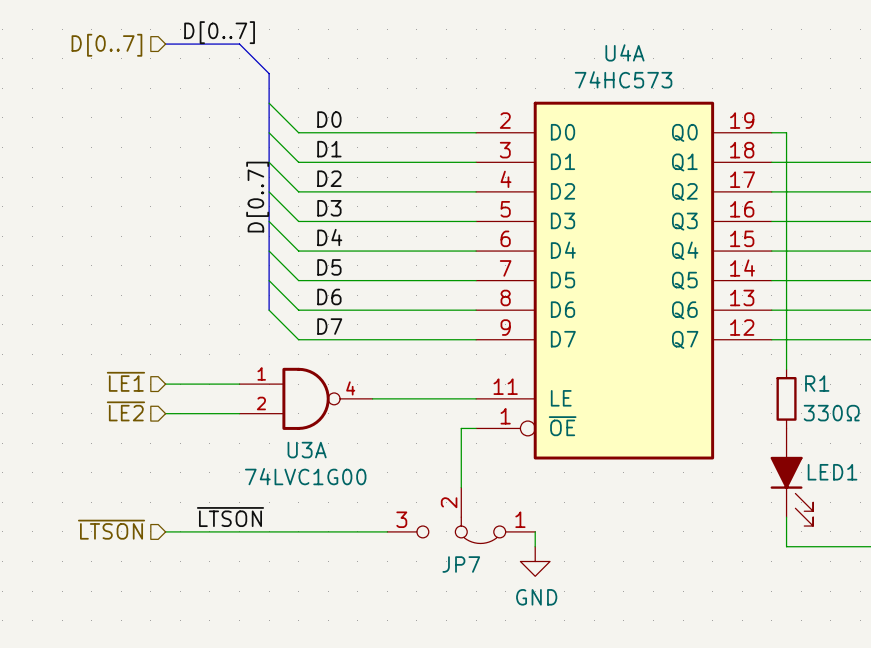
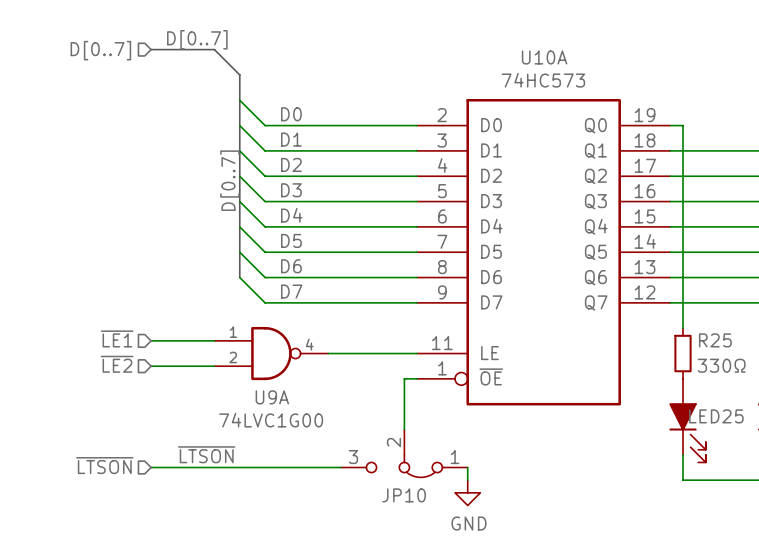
U4A name: U4A (624, 52) -> U10A (544, 57)
R1 name: R1 (817, 383) -> R25 (715, 340)
U3A name: U3A (307, 450) -> U9A (272, 397)
LED1 name: LED1 (832, 472) -> LED25 (716, 416)
JP7 name: JP7 (461, 564) -> JP10 (404, 495)

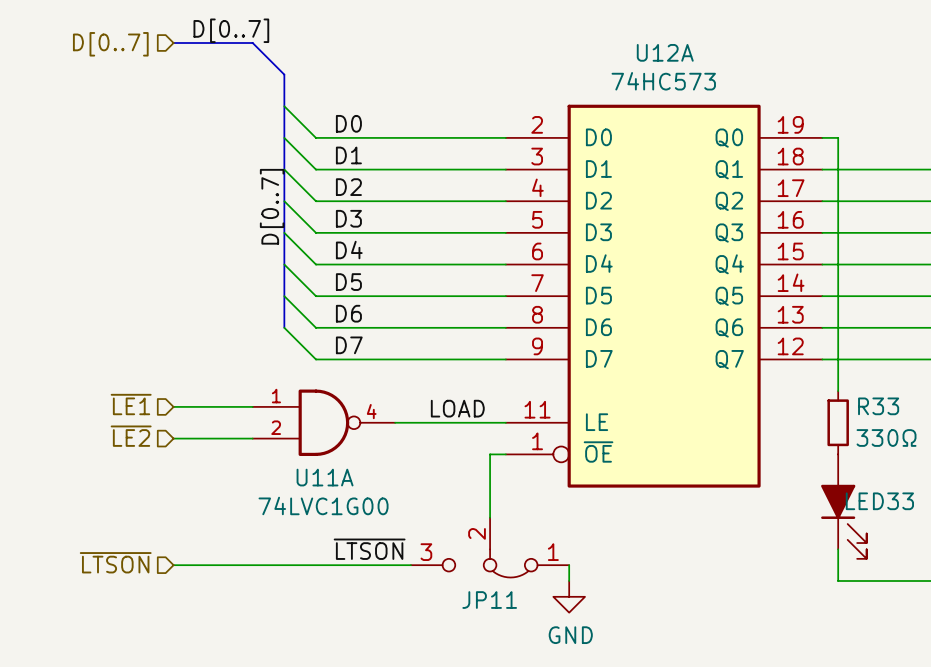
U10A name: U10A (544, 57) -> U12A (665, 52)
R25 name: R25 (715, 340) -> R33 (878, 406)
label: none -> LOAD (457, 408)
U9A name: U9A (272, 397) -> U11A (325, 477)
LED25 name: LED25 (716, 416) -> LED33 (879, 501)
label position: ~{LTSON} (206, 454) -> ~{LTSON} (369, 549)
JP10 name: JP10 (404, 495) -> JP11 (489, 600)

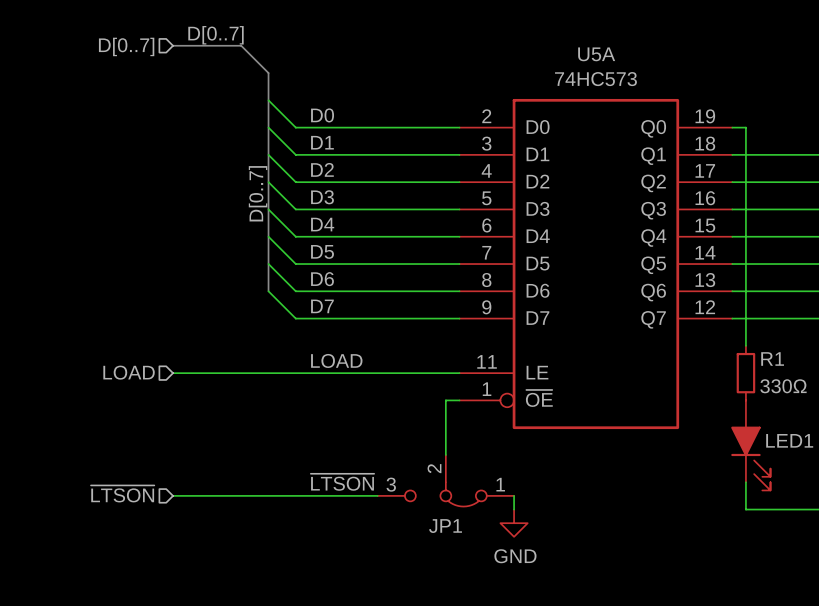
U12A name: U12A (665, 52) -> U5A (596, 54)
hierarchical label: ~{LE1} (131, 404) -> none
wire: (173, 406) (252, 406) -> none
R33 name: R33 (878, 406) -> R1 (772, 358)
label position: LOAD (457, 408) -> LOAD (336, 360)
hierarchical label: none -> LOAD (129, 372)
wire: none -> (173, 373) (364, 373)
U11A: 74LVC1G00 (323, 422) -> none
hierarchical label: ~{LE2} (131, 436) -> none
wire: (173, 438) (252, 438) -> none
LED33 name: LED33 (879, 501) -> LED1 (789, 440)
JP11 name: JP11 (489, 600) -> JP1 (445, 526)

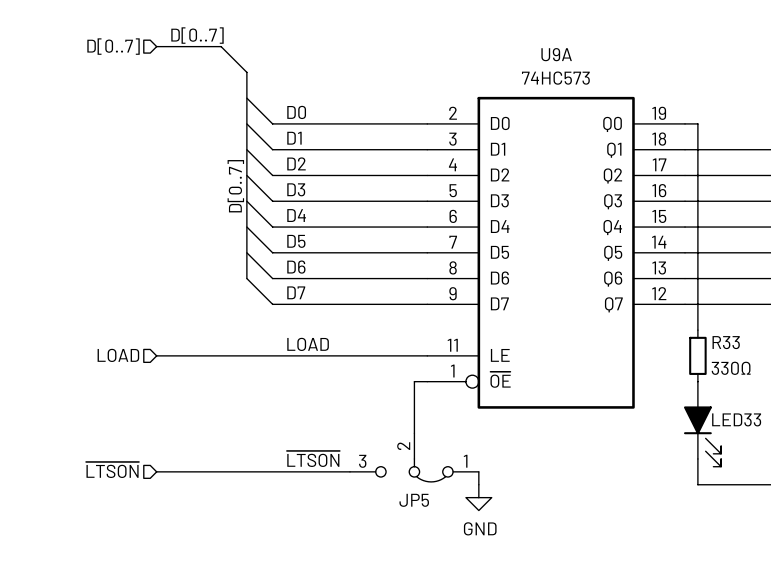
U5A name: U5A (596, 54) -> U9A (556, 54)
R1 name: R1 (772, 358) -> R33 (726, 342)
LED1 name: LED1 (789, 440) -> LED33 (736, 419)
JP1 name: JP1 (445, 526) -> JP5 (414, 500)

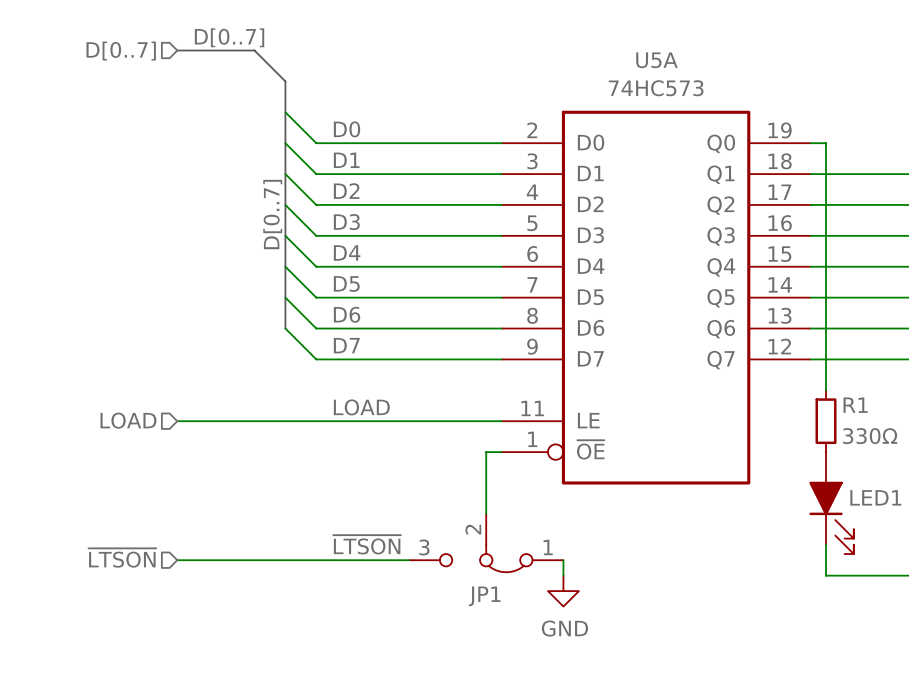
U9A name: U9A (556, 54) -> U5A (656, 60)
R33 name: R33 (726, 342) -> R1 (855, 405)
LED33 name: LED33 (736, 419) -> LED1 (875, 497)
JP5 name: JP5 (414, 500) -> JP1 (484, 596)

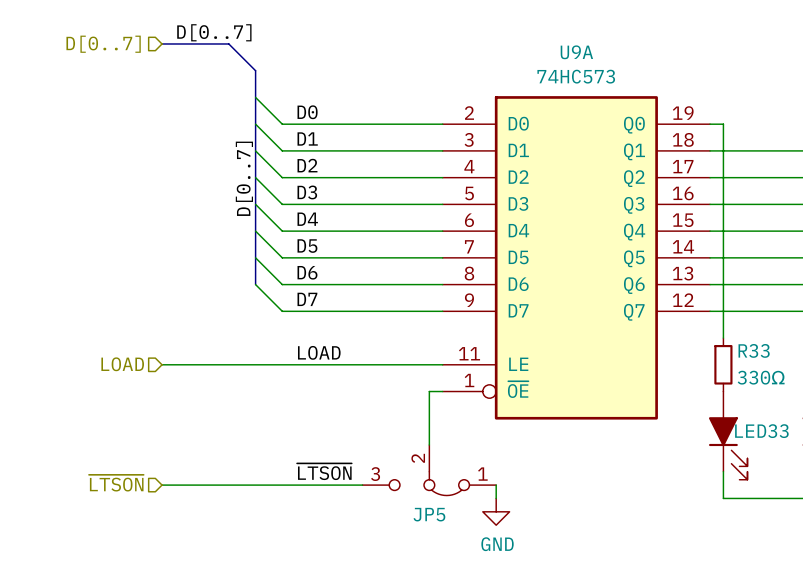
U5A name: U5A (656, 60) -> U9A (576, 52)
R1 name: R1 (855, 405) -> R33 (754, 350)
LED1 name: LED1 (875, 497) -> LED33 (761, 431)
JP1 name: JP1 (484, 596) -> JP5 (429, 514)

